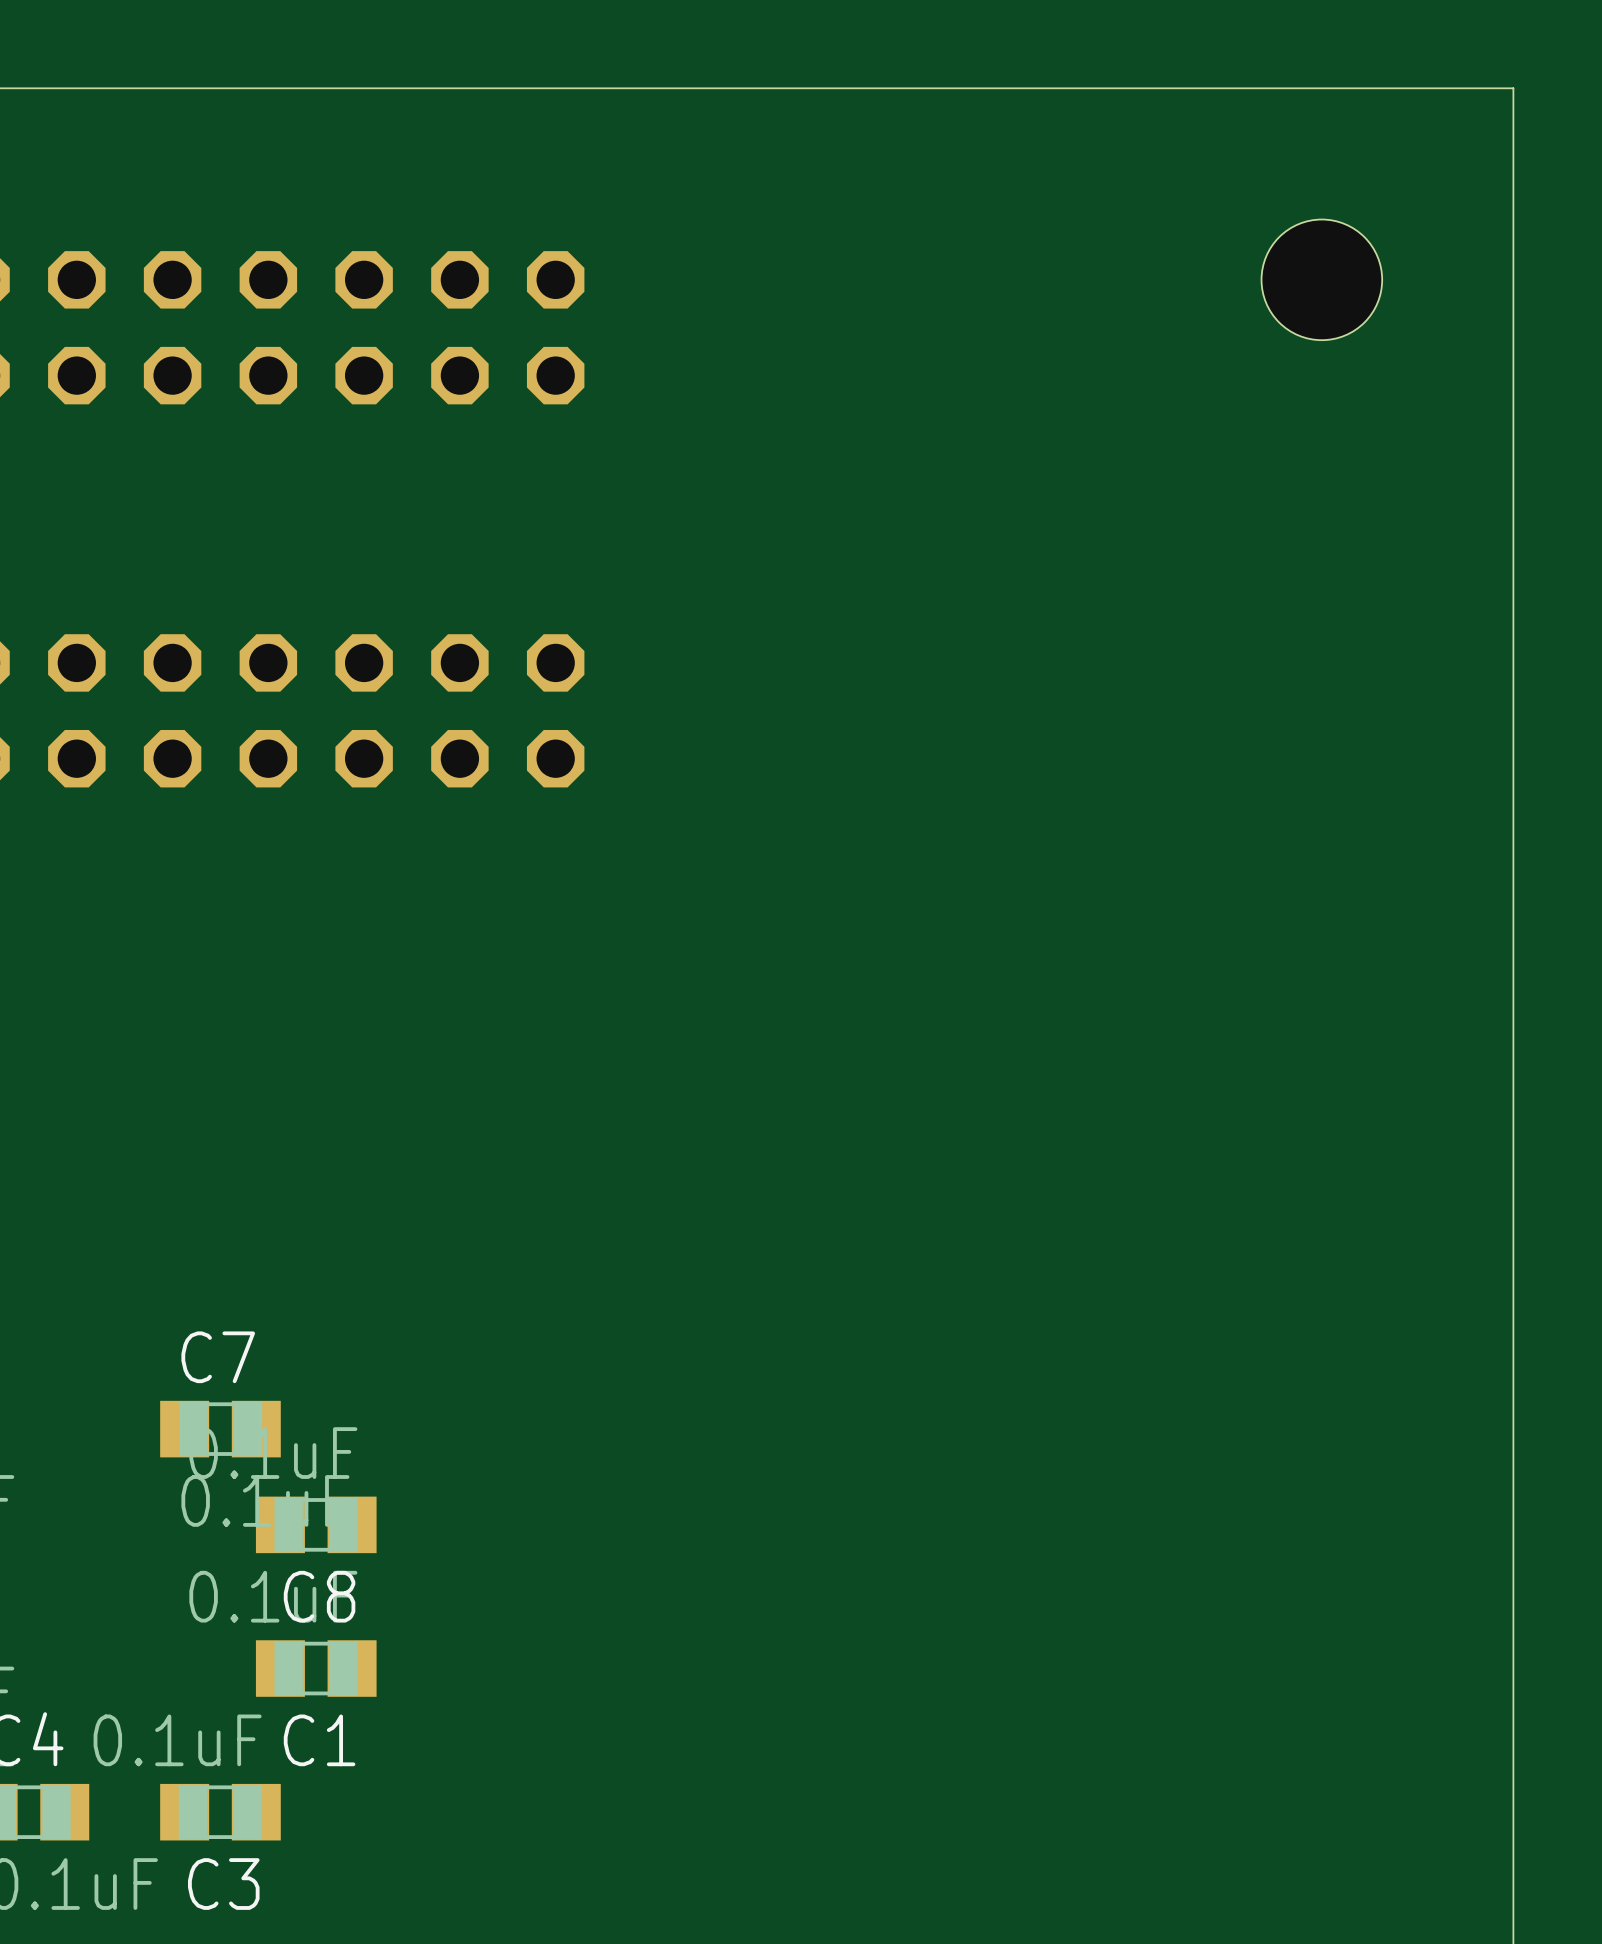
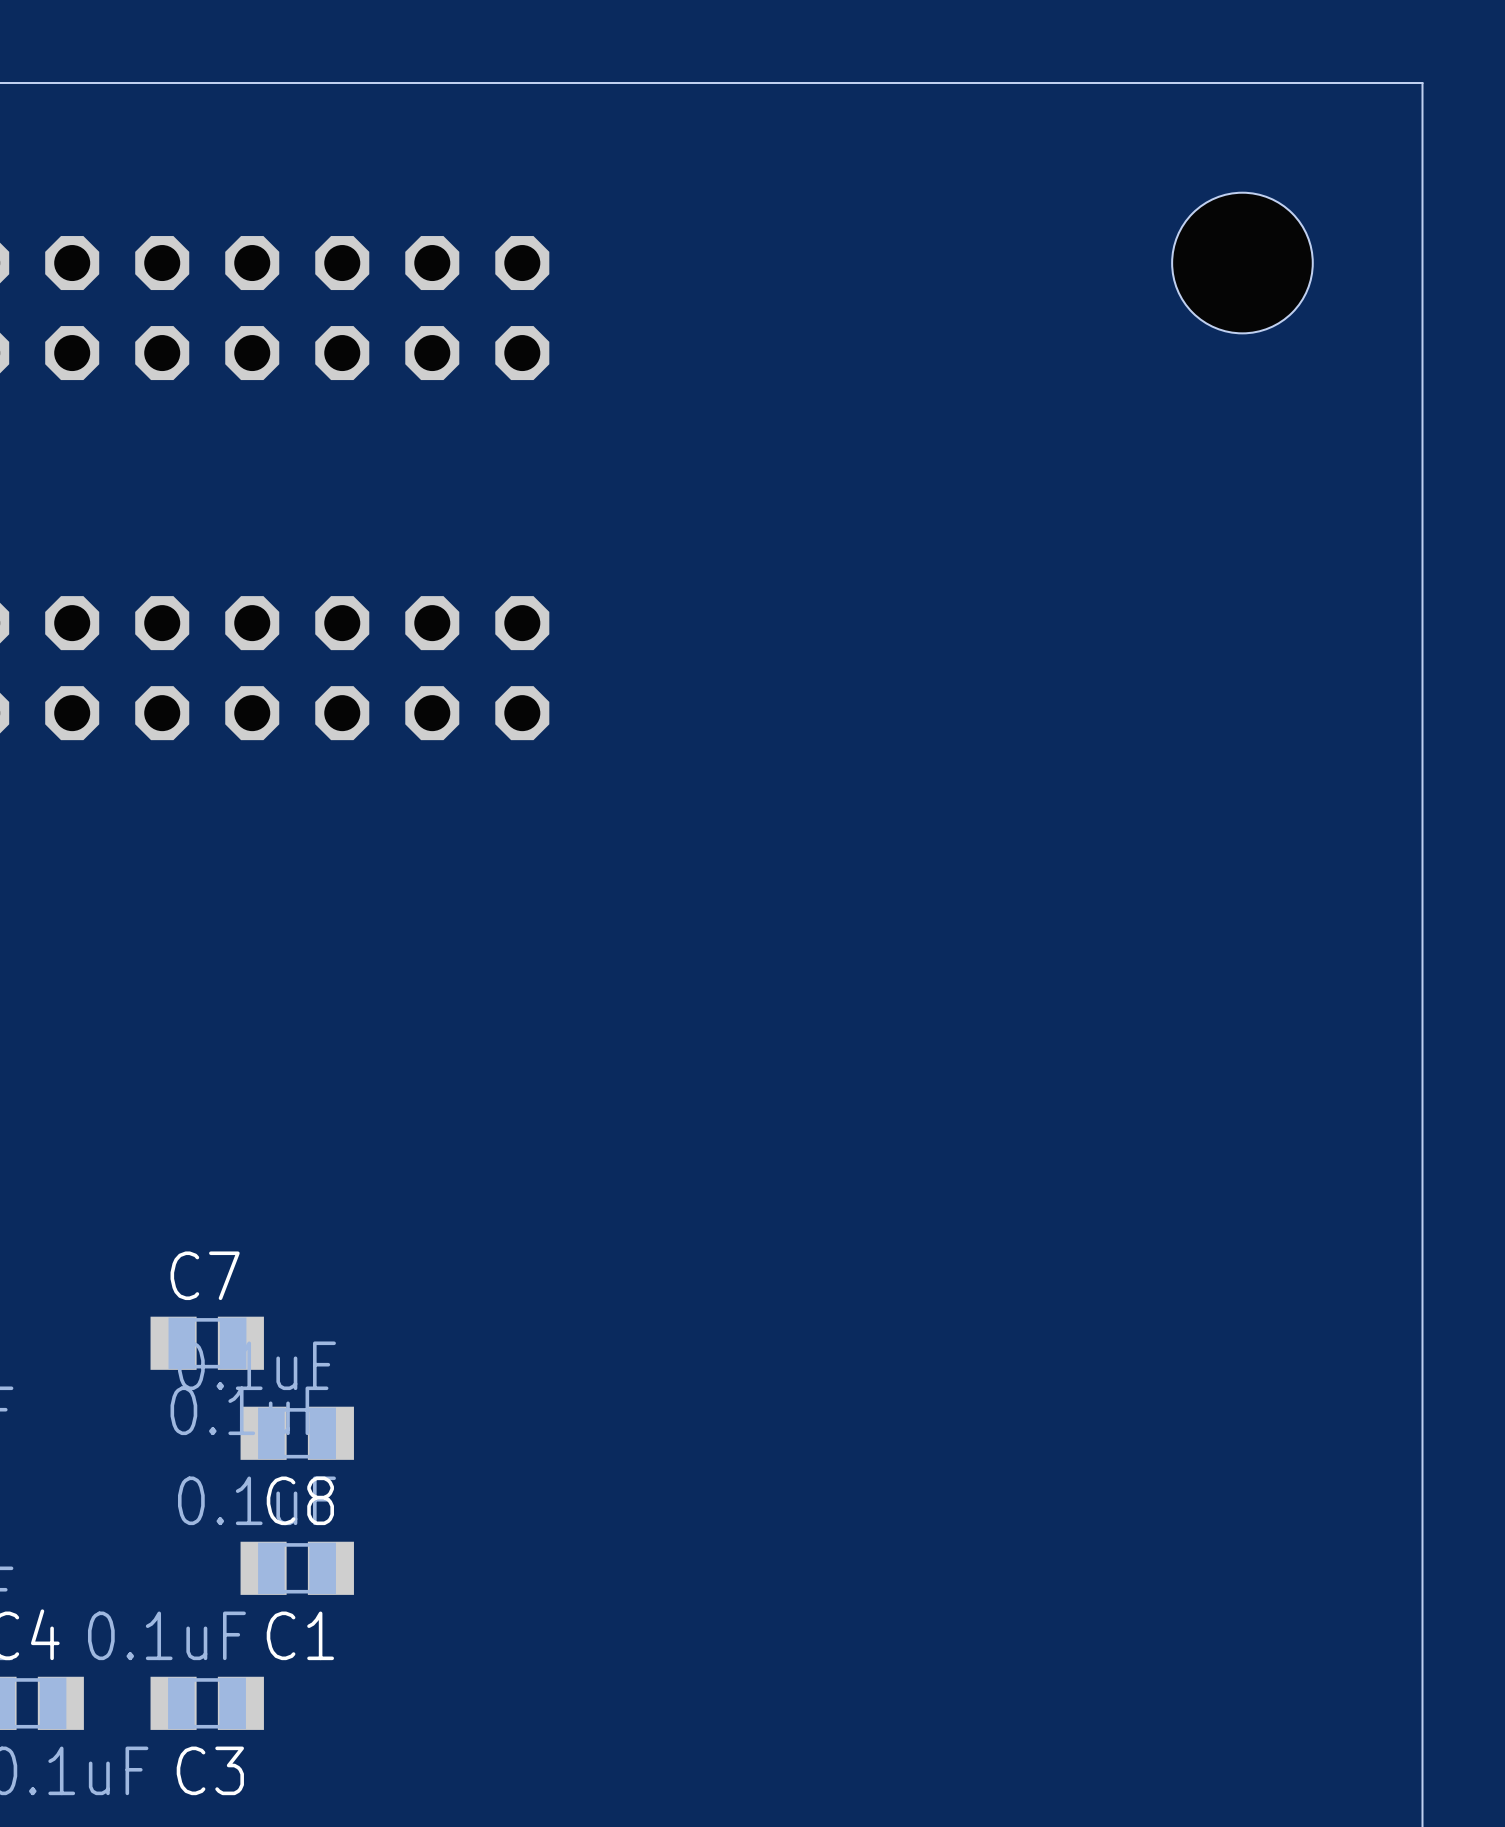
hole size: [1261, 219, 1383, 341] -> [1172, 192, 1313, 334]

